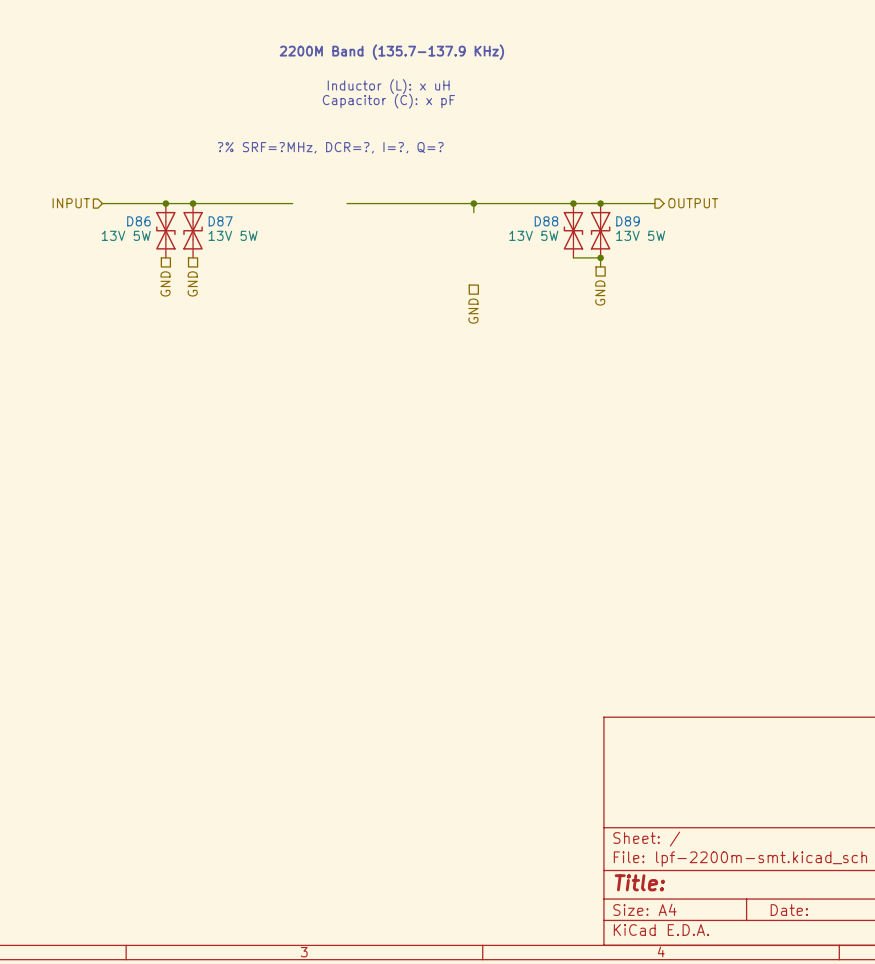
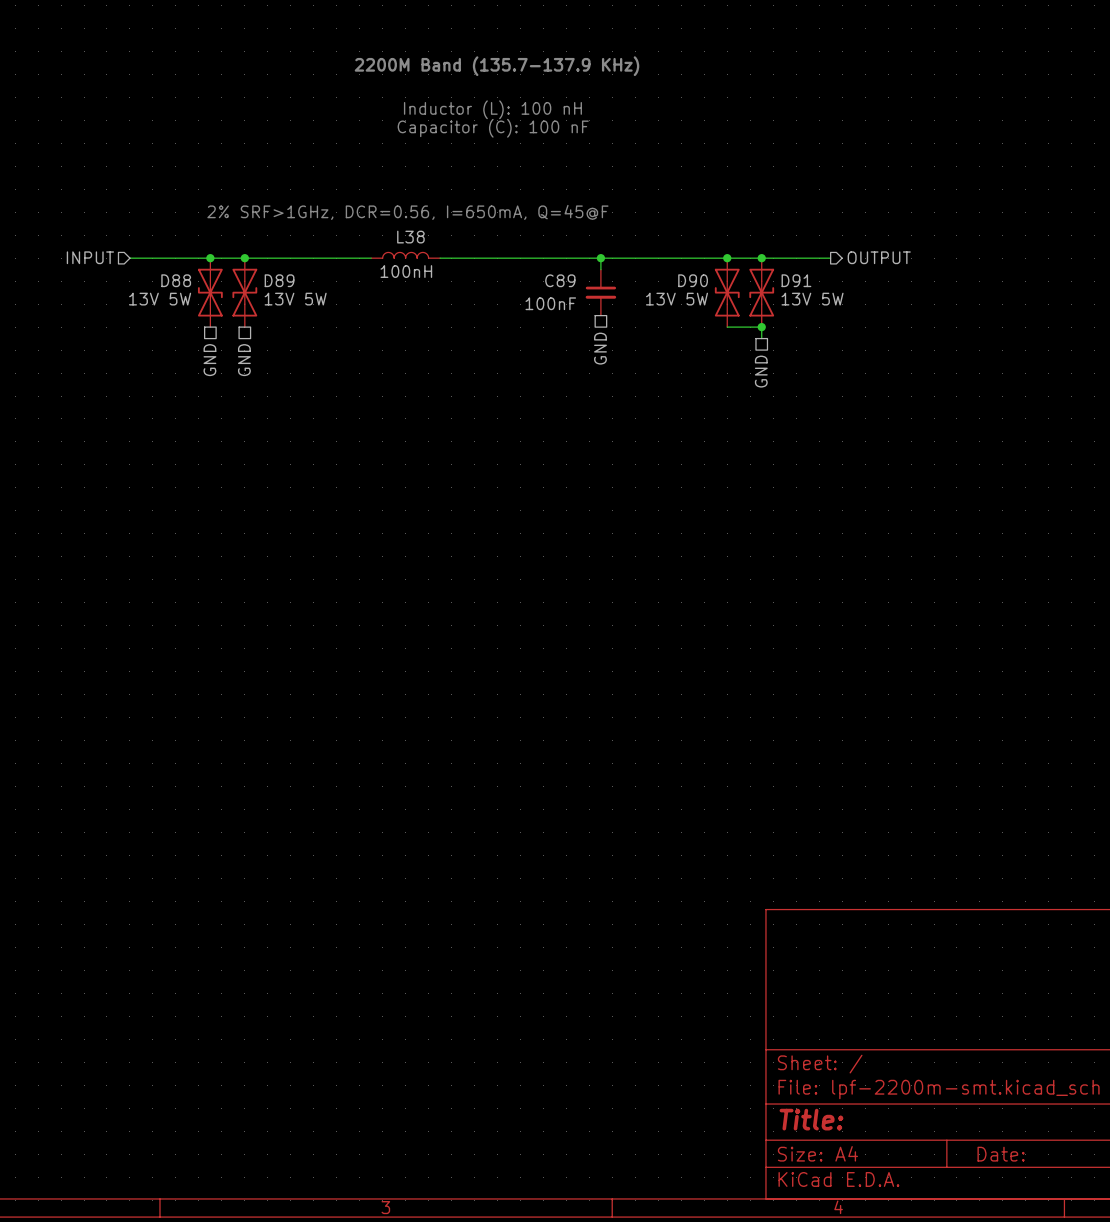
text: Inductor (L): x uH (388, 86) -> Inductor (L): 100 nH (492, 109)
text: Capacitor (C): x pF (388, 101) -> Capacitor (C): 100 nF (493, 128)
text: ?% SRF=?MHz, DCR=?, I=?, Q=? (330, 147) -> none
text: none -> 2% SRF>1GHz, DCR=0.56, I=650mA, Q=45@F (407, 212)
L38: none -> 100nH (405, 255)
D86 name: D86 (138, 221) -> D88 (176, 280)
D87 name: D87 (220, 221) -> D89 (279, 280)
D88 name: D88 (546, 221) -> D90 (693, 280)
D89 name: D89 (628, 221) -> D91 (796, 280)
C89: none -> 100nF (600, 292)
hierarchical label position: GND (473, 311) -> GND (600, 348)

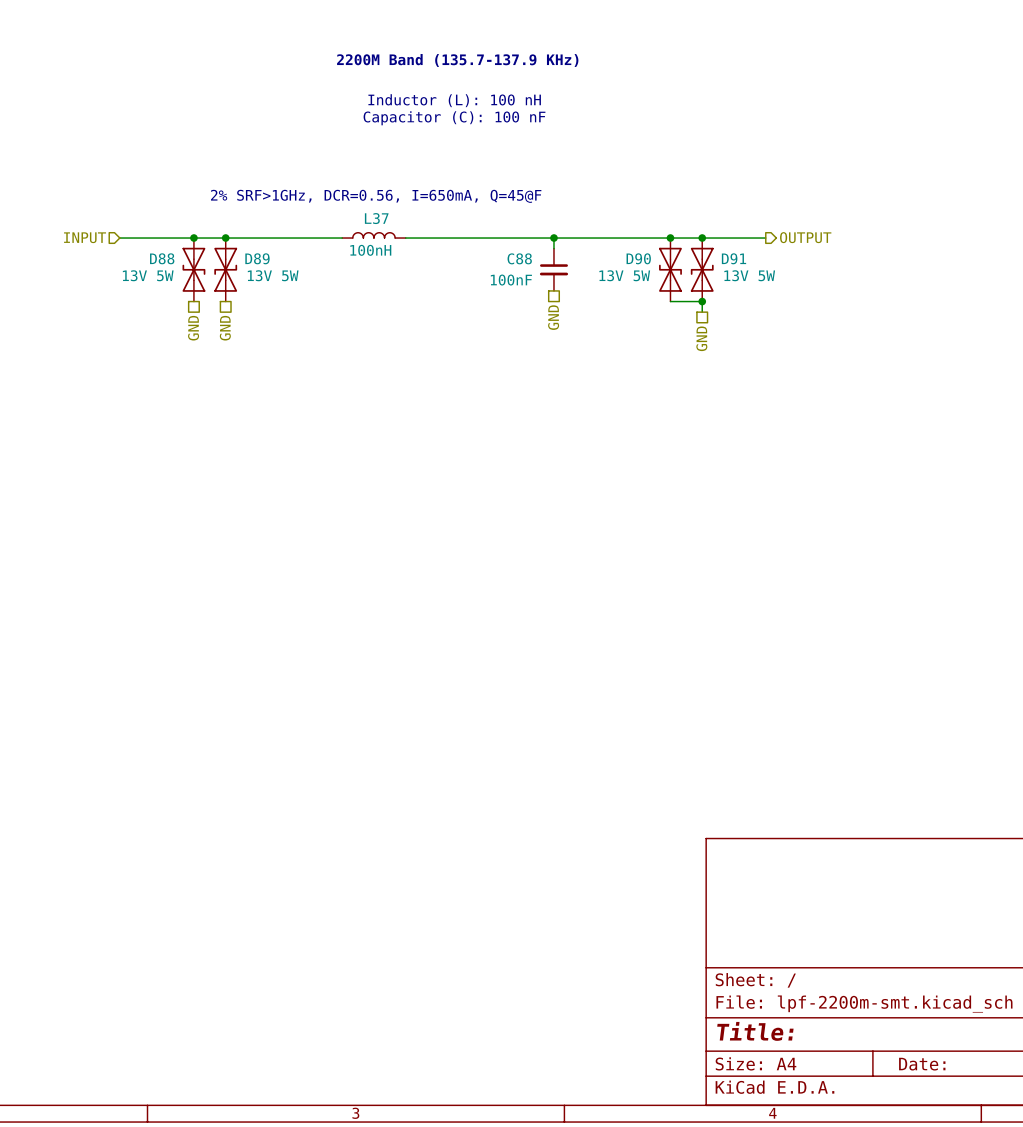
L38 name: L38 (410, 237) -> L37 (376, 218)
C89 name: C89 (560, 280) -> C88 (519, 258)

